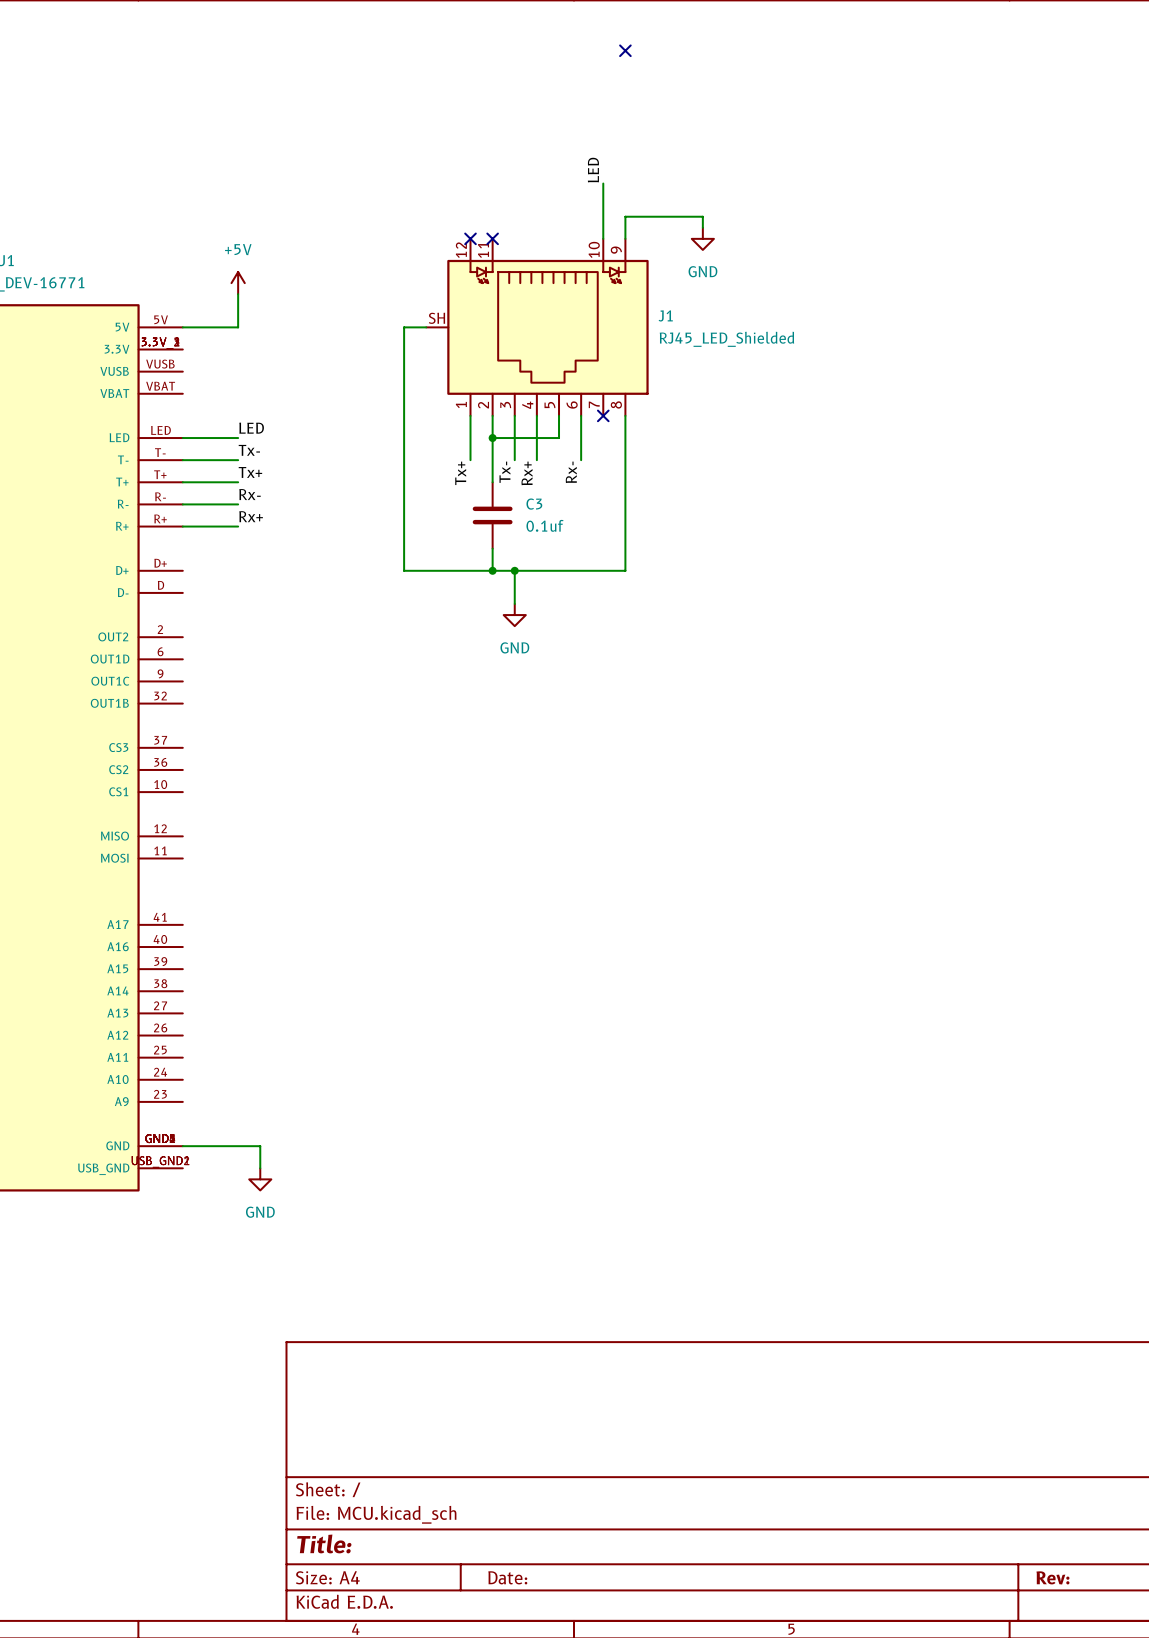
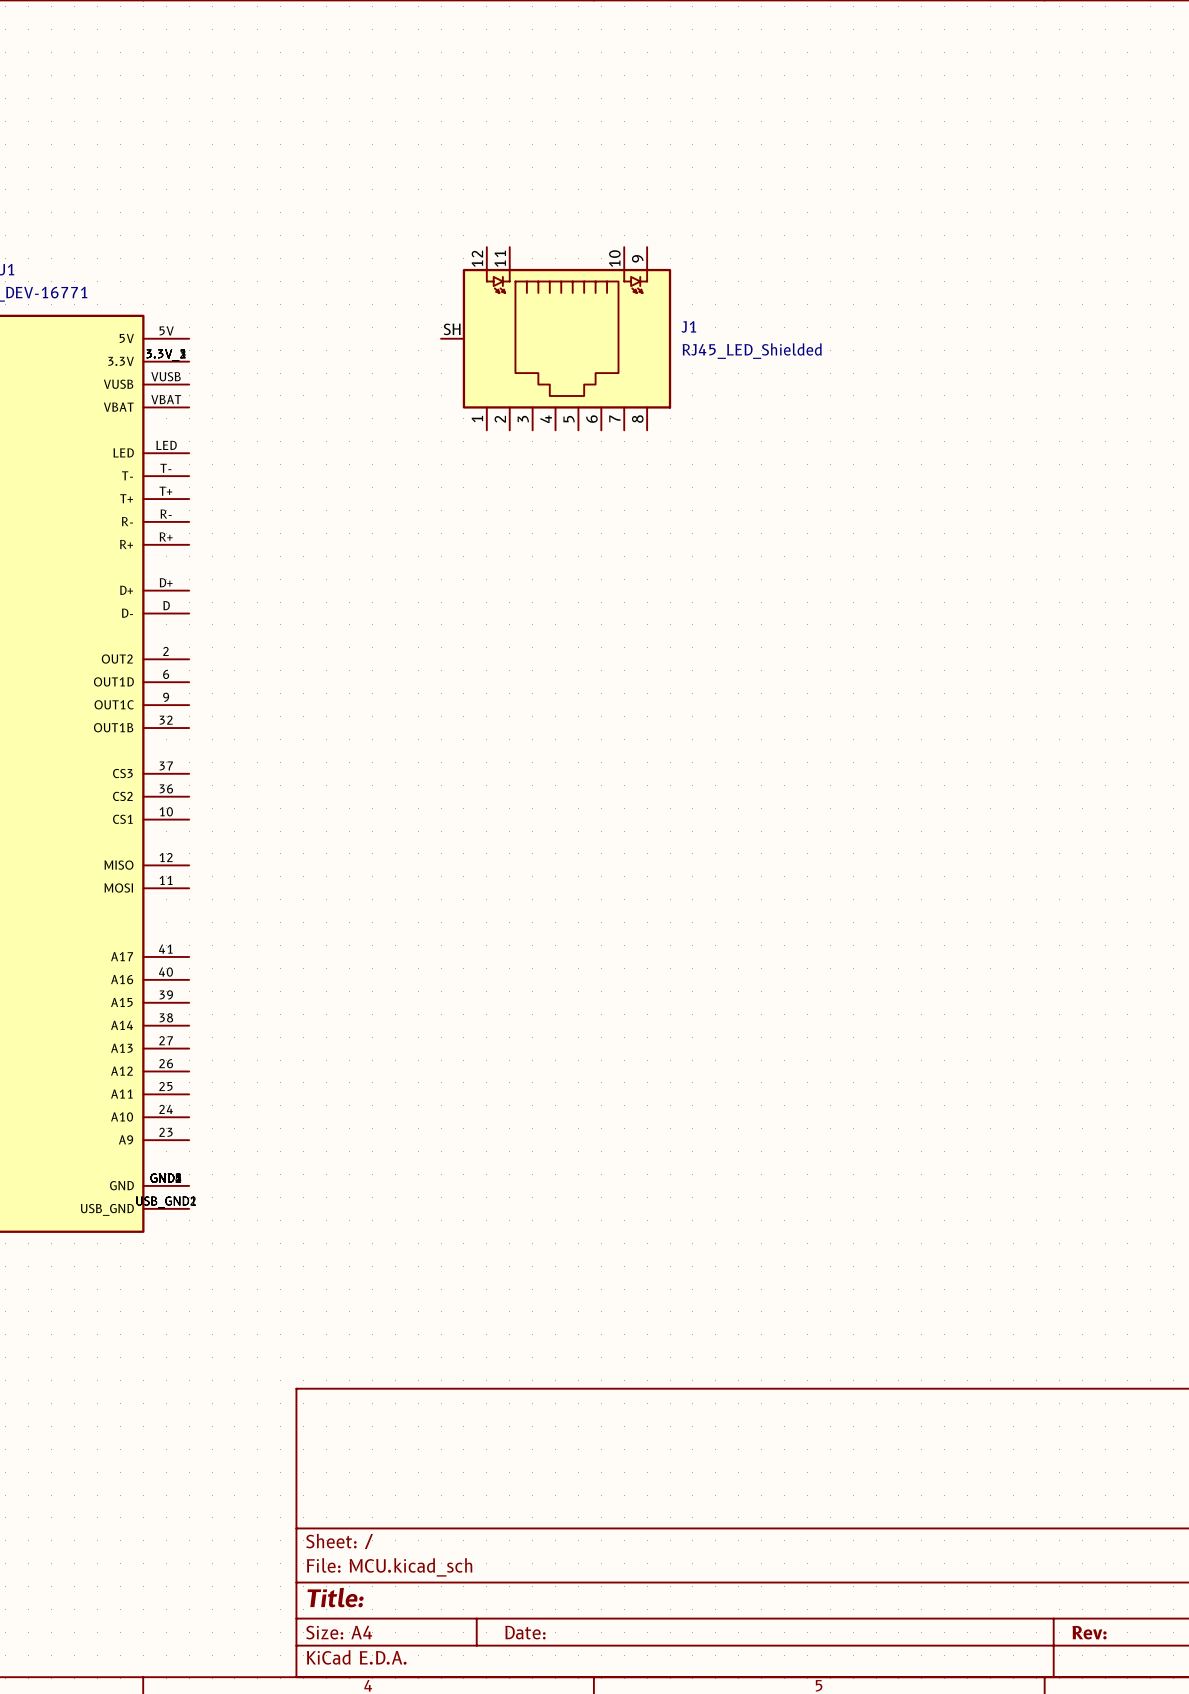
no-connect mark: (625, 50) -> none
label: LED (593, 170) -> none
wire: (603, 183) (603, 238) -> none
wire: (702, 227) (702, 216) (625, 216) (625, 238) -> none
no-connect mark: (470, 238) -> none
no-connect mark: (492, 238) -> none
power symbol: GND (702, 238) -> none
power symbol: +5V (238, 283) -> none
wire: (238, 294) (238, 327) (182, 327) -> none
wire: (426, 327) (404, 327) (404, 570) (625, 570) (625, 415) -> none
wire: (470, 415) (470, 460) -> none
wire: (492, 415) (492, 482) -> none
wire: (514, 415) (514, 460) -> none
wire: (536, 415) (536, 460) -> none
wire: (559, 415) (559, 438) (492, 438) -> none
wire: (581, 415) (581, 460) -> none
no-connect mark: (603, 415) -> none
label: LED (251, 428) -> none
wire: (182, 438) (238, 438) -> none
junction: (492, 438) -> none
label: Tx- (249, 450) -> none
wire: (182, 460) (238, 460) -> none
label: Tx+ (250, 472) -> none
label: Tx- (504, 472) -> none
label: Rx- (571, 472) -> none
label: Tx+ (460, 473) -> none
label: Rx+ (527, 473) -> none
wire: (182, 482) (238, 482) -> none
label: Rx- (249, 494) -> none
wire: (182, 504) (238, 504) -> none
C3: 0.1uf (492, 515) -> none
label: Rx+ (251, 516) -> none
wire: (182, 526) (238, 526) -> none
wire: (492, 548) (492, 570) -> none
junction: (492, 570) -> none
wire: (514, 570) (514, 604) -> none
junction: (514, 570) -> none
power symbol: GND (514, 615) -> none
wire: (182, 1146) (260, 1146) (260, 1168) -> none
power symbol: GND (260, 1179) -> none

